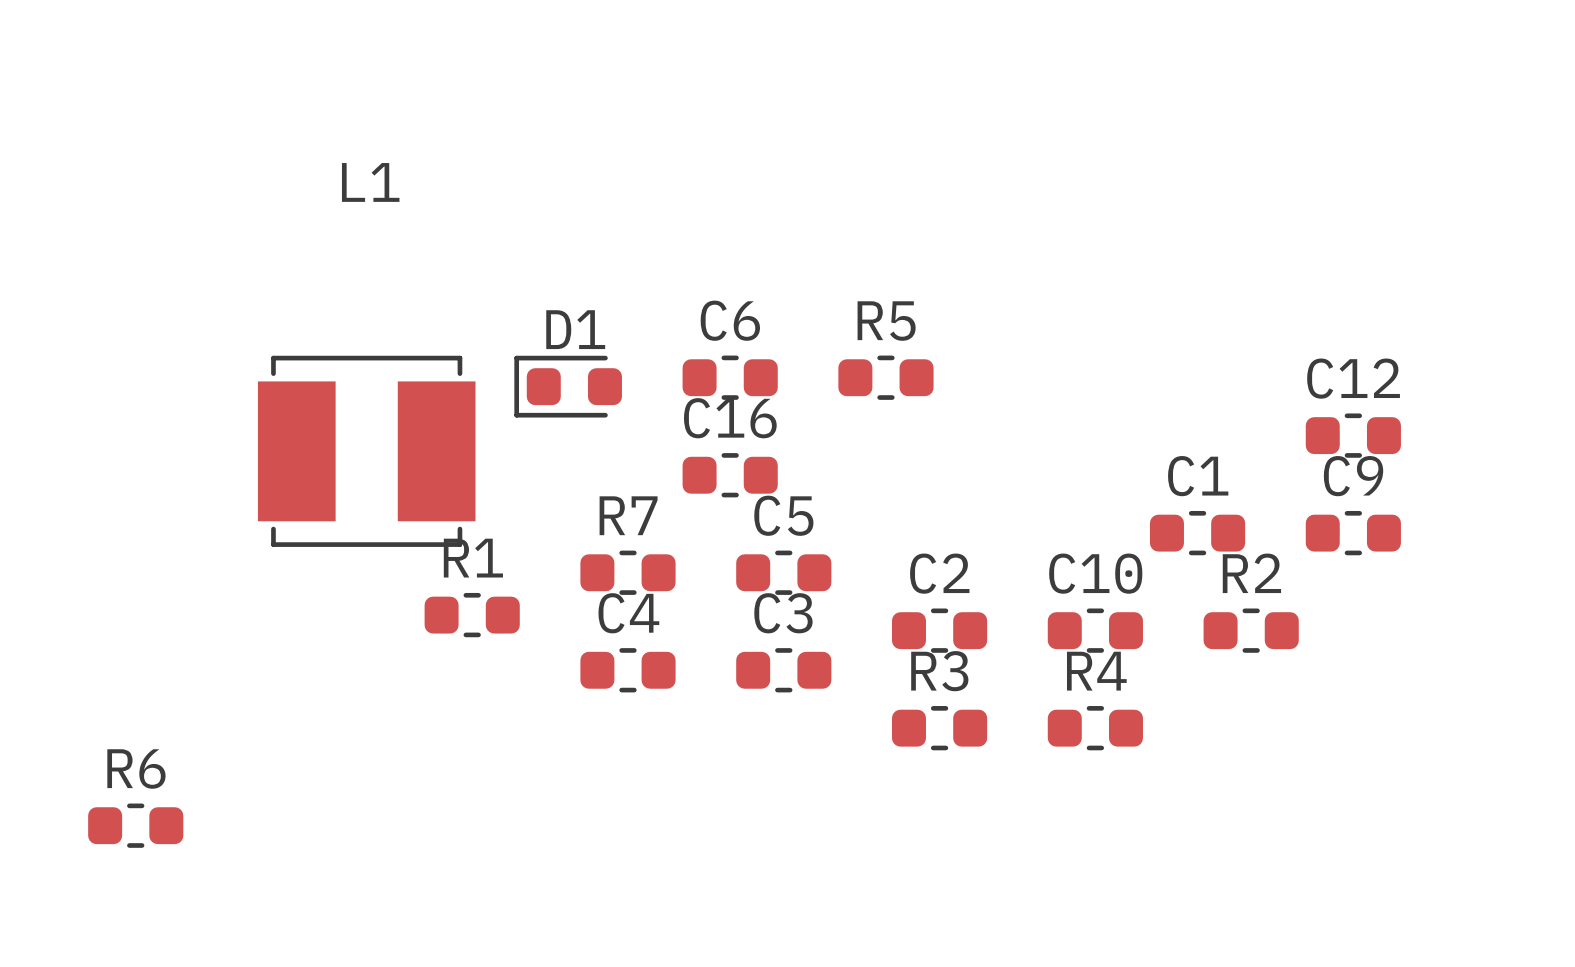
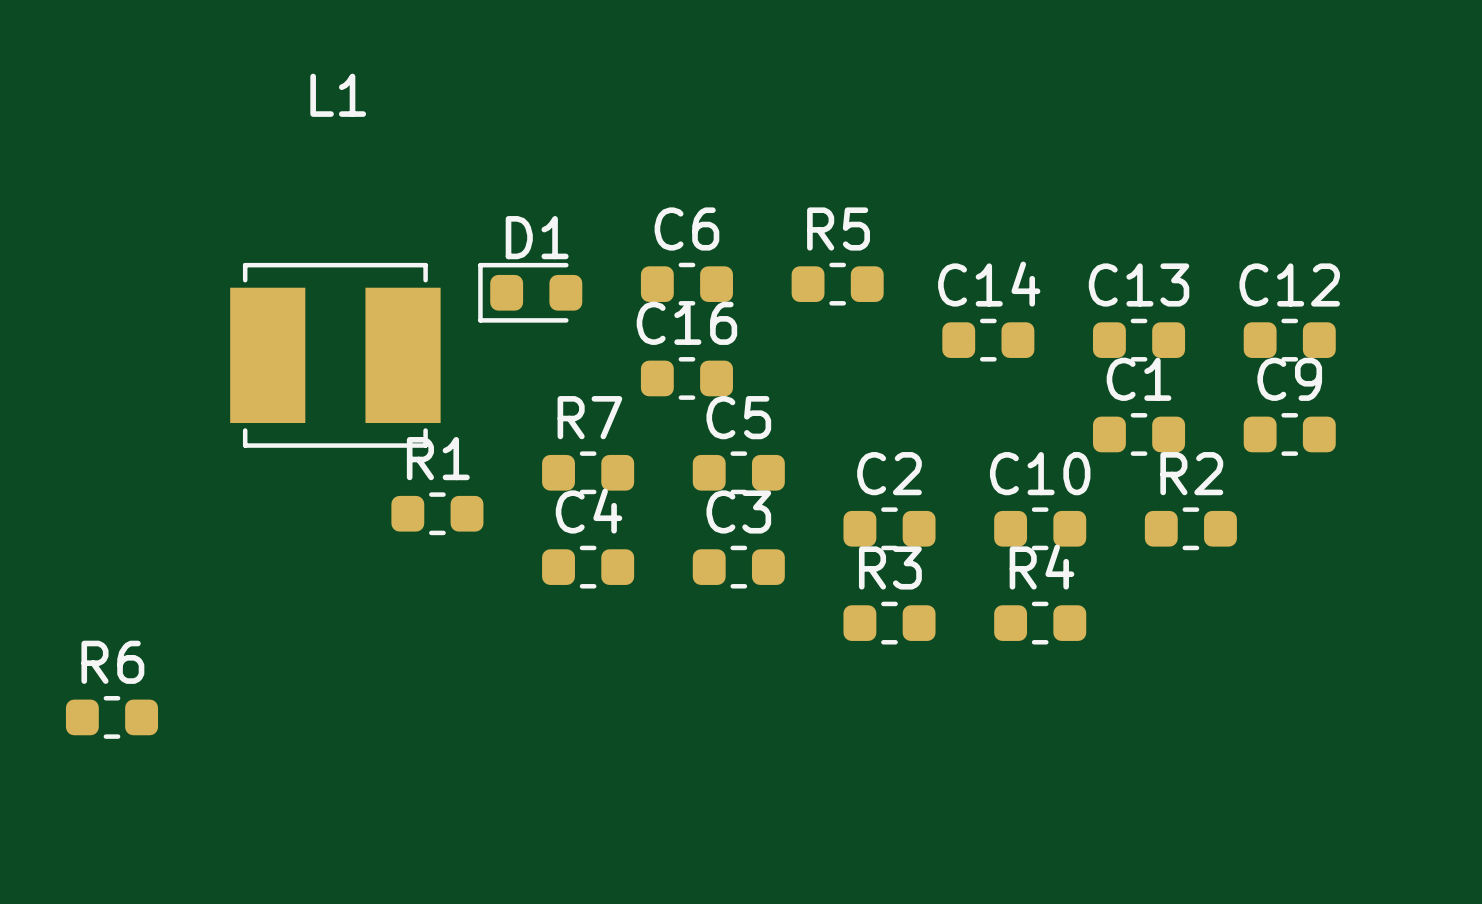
C14: none -> (988, 340)
C13: none -> (1139, 340)

